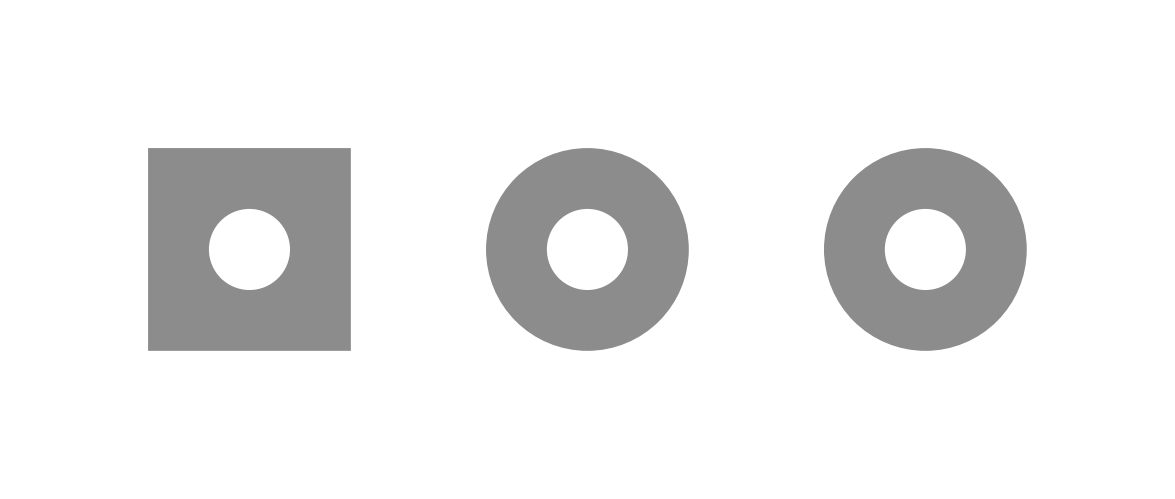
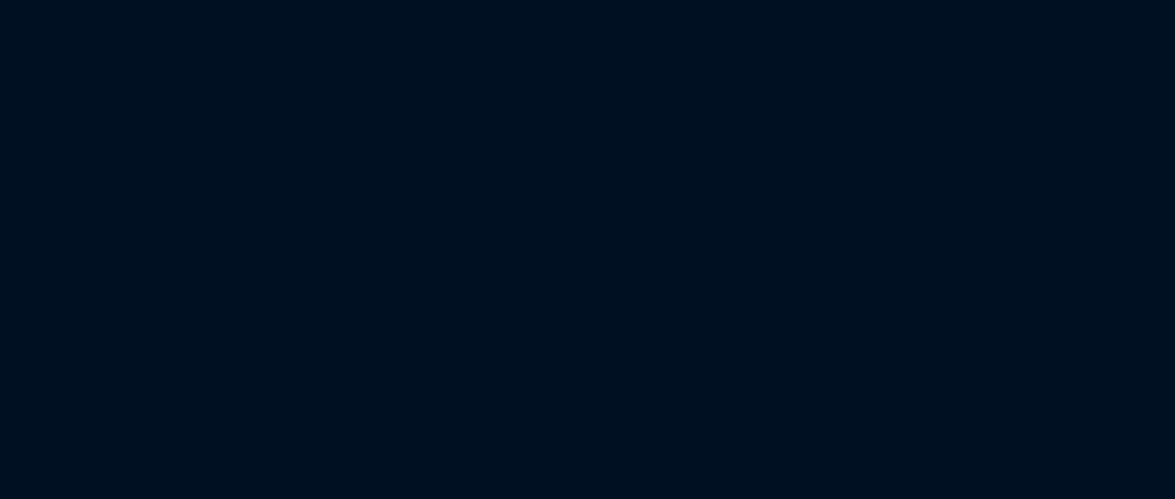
part: (587, 249) -> none

